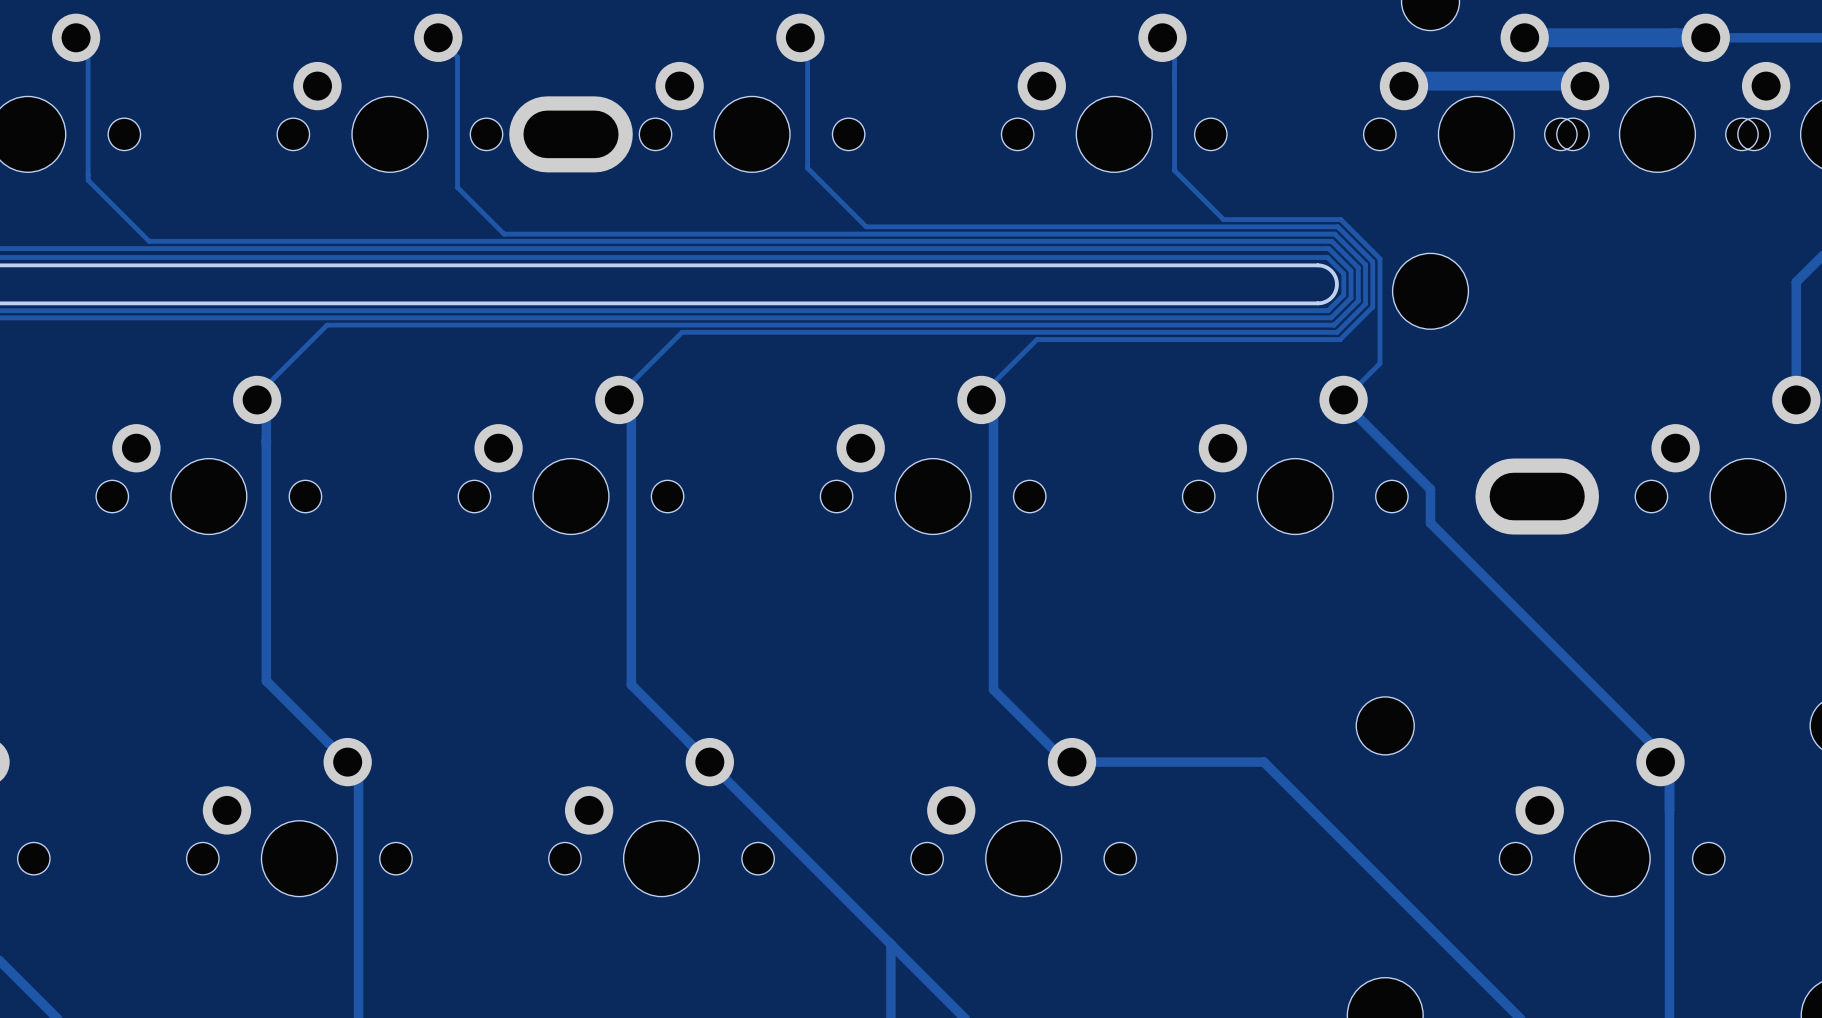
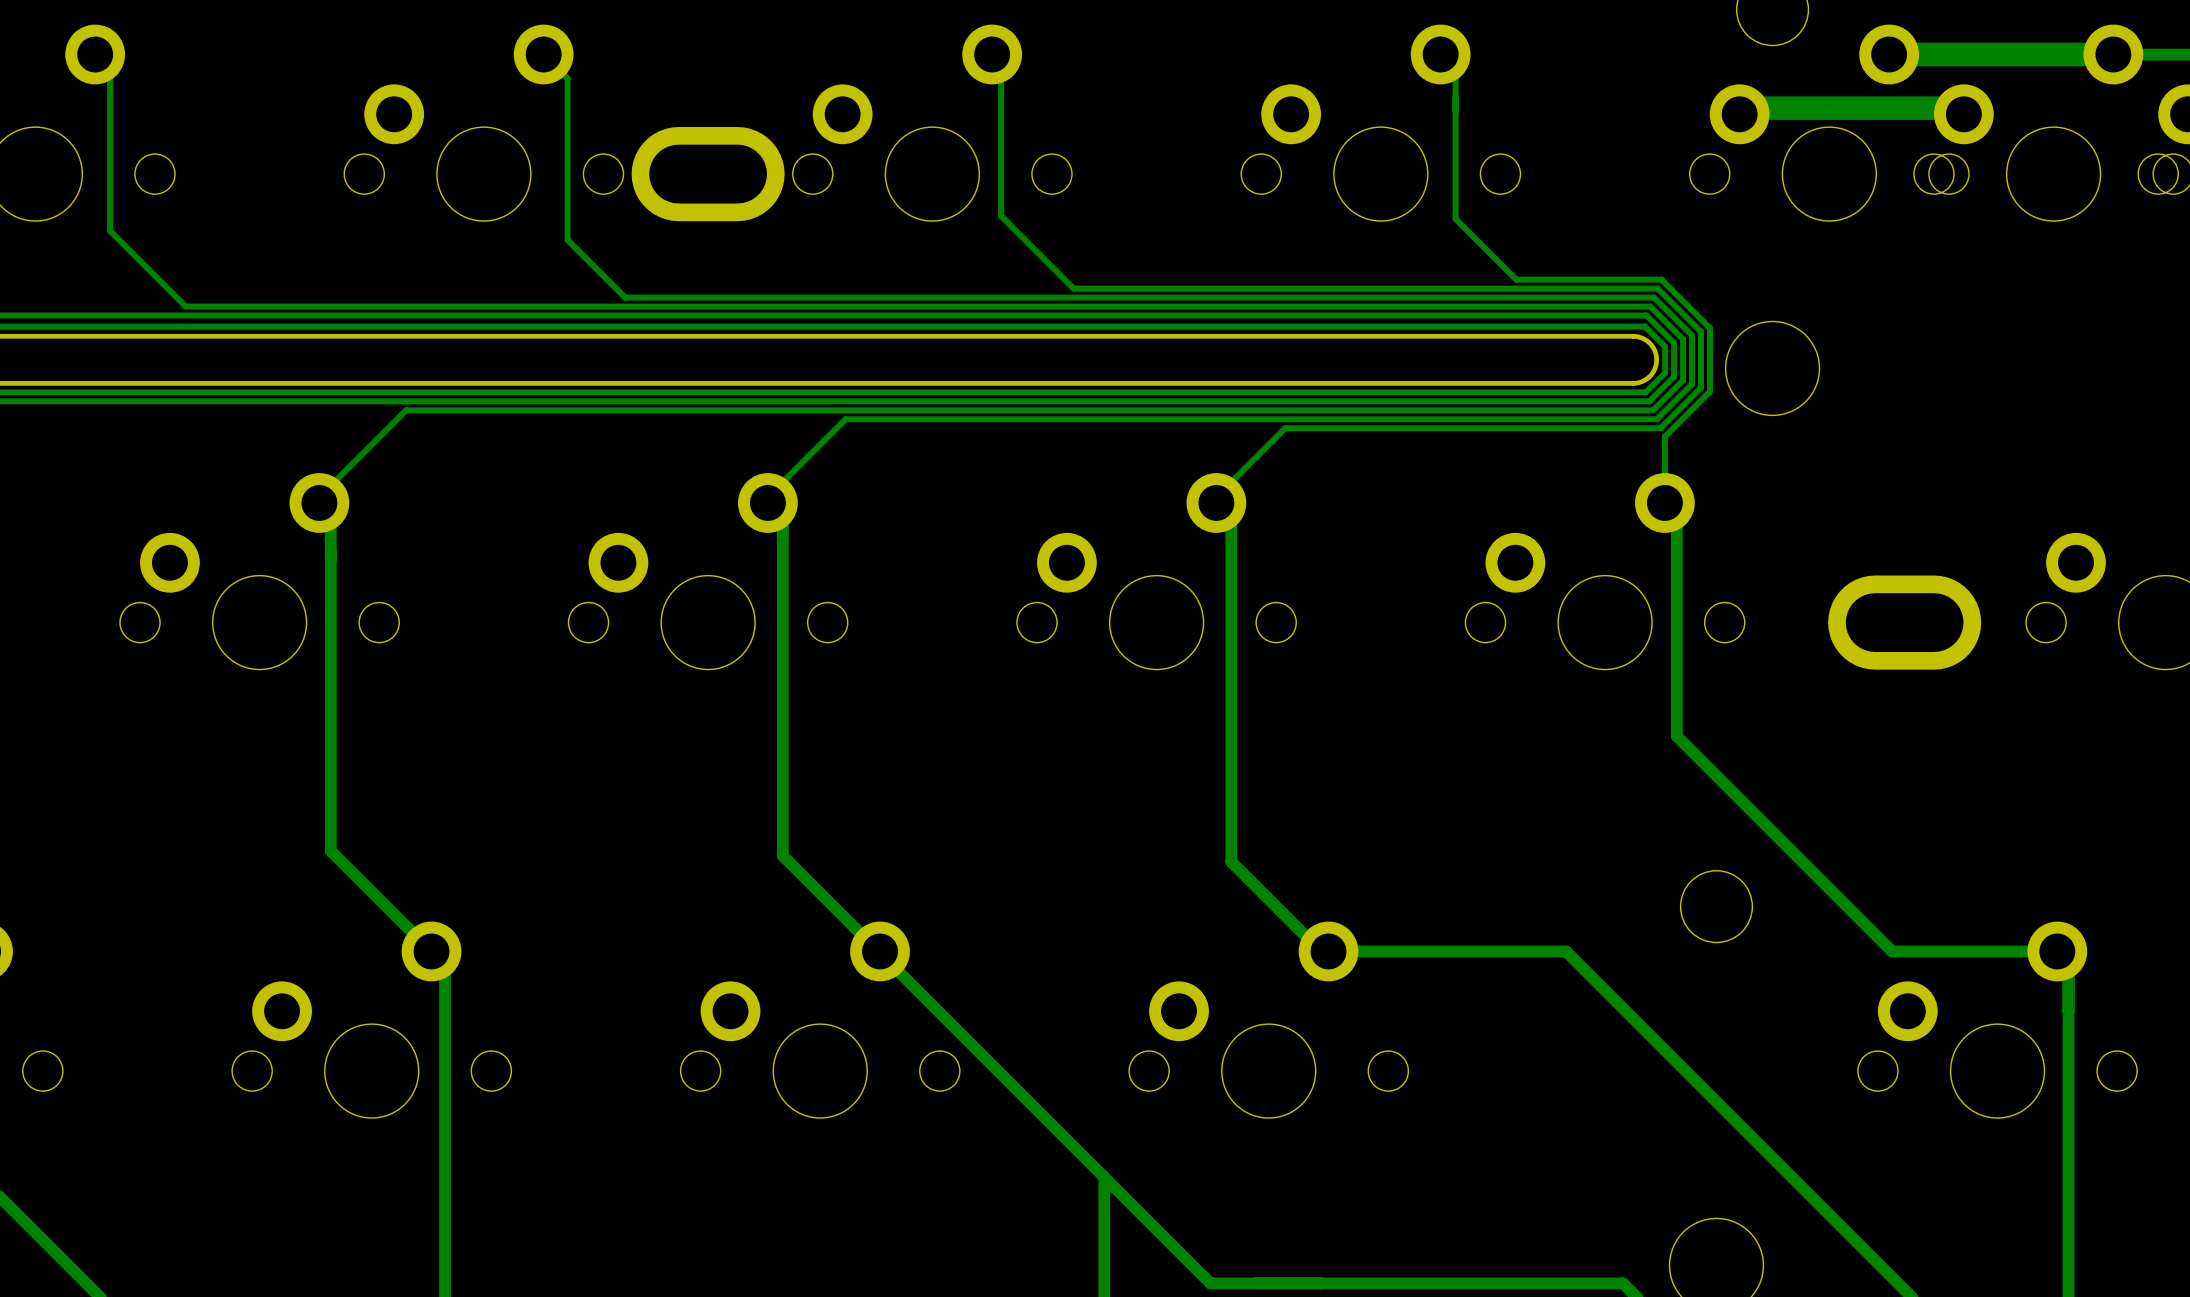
track: (1380, 309) (1380, 363) (1343, 399) -> (1709, 391) (1664, 436) (1664, 502) (1661, 502)
track: (1353, 412) (1430, 489) (1430, 523) (1669, 762) -> (1676, 517) (1676, 736) (1892, 951) (2056, 951)

